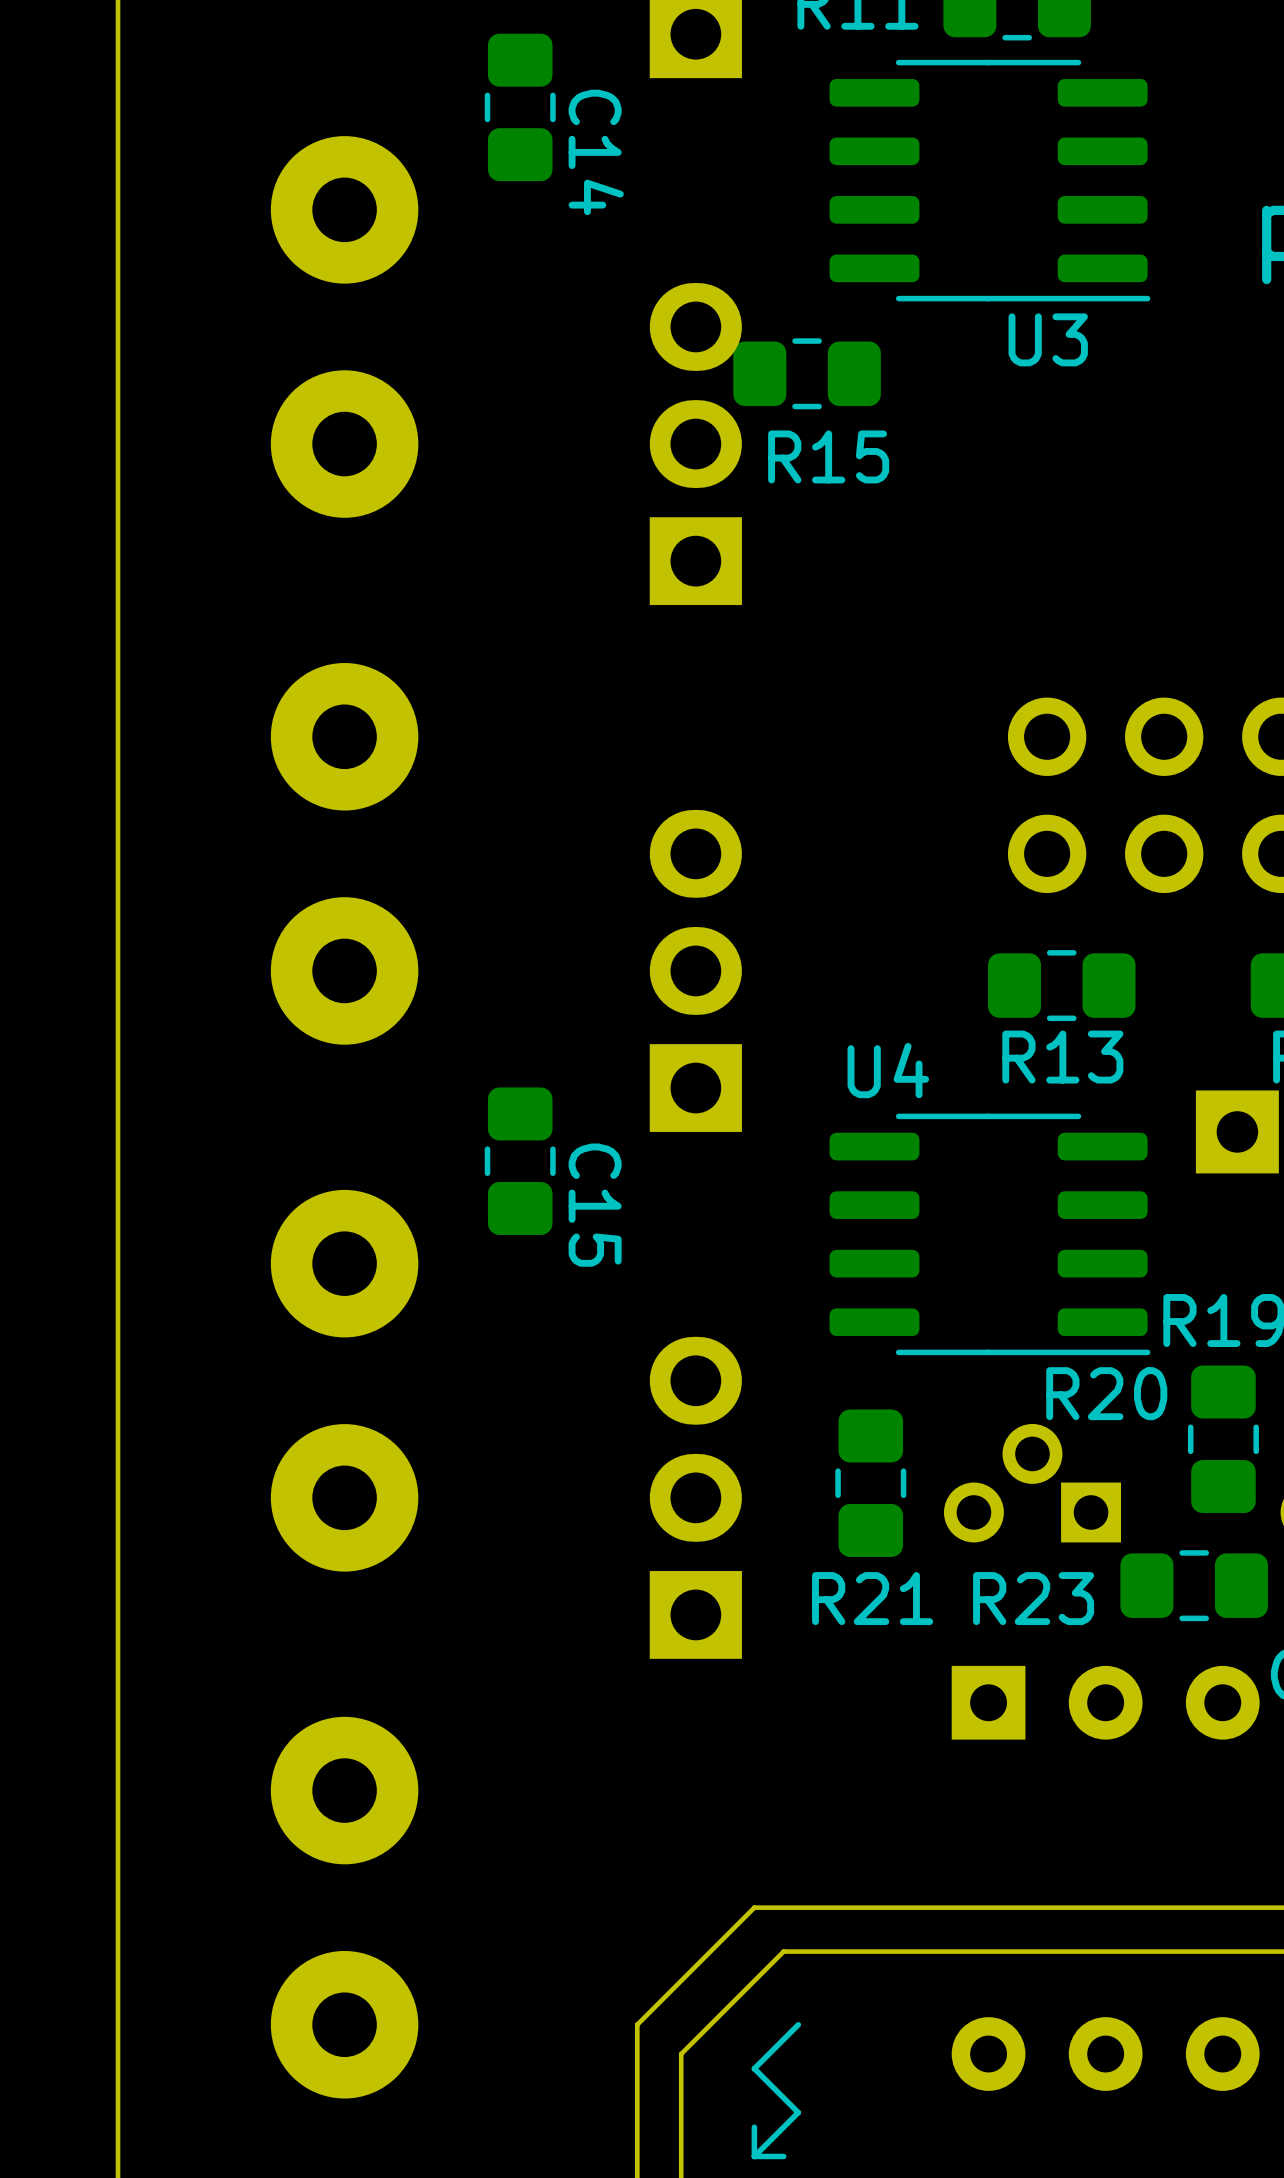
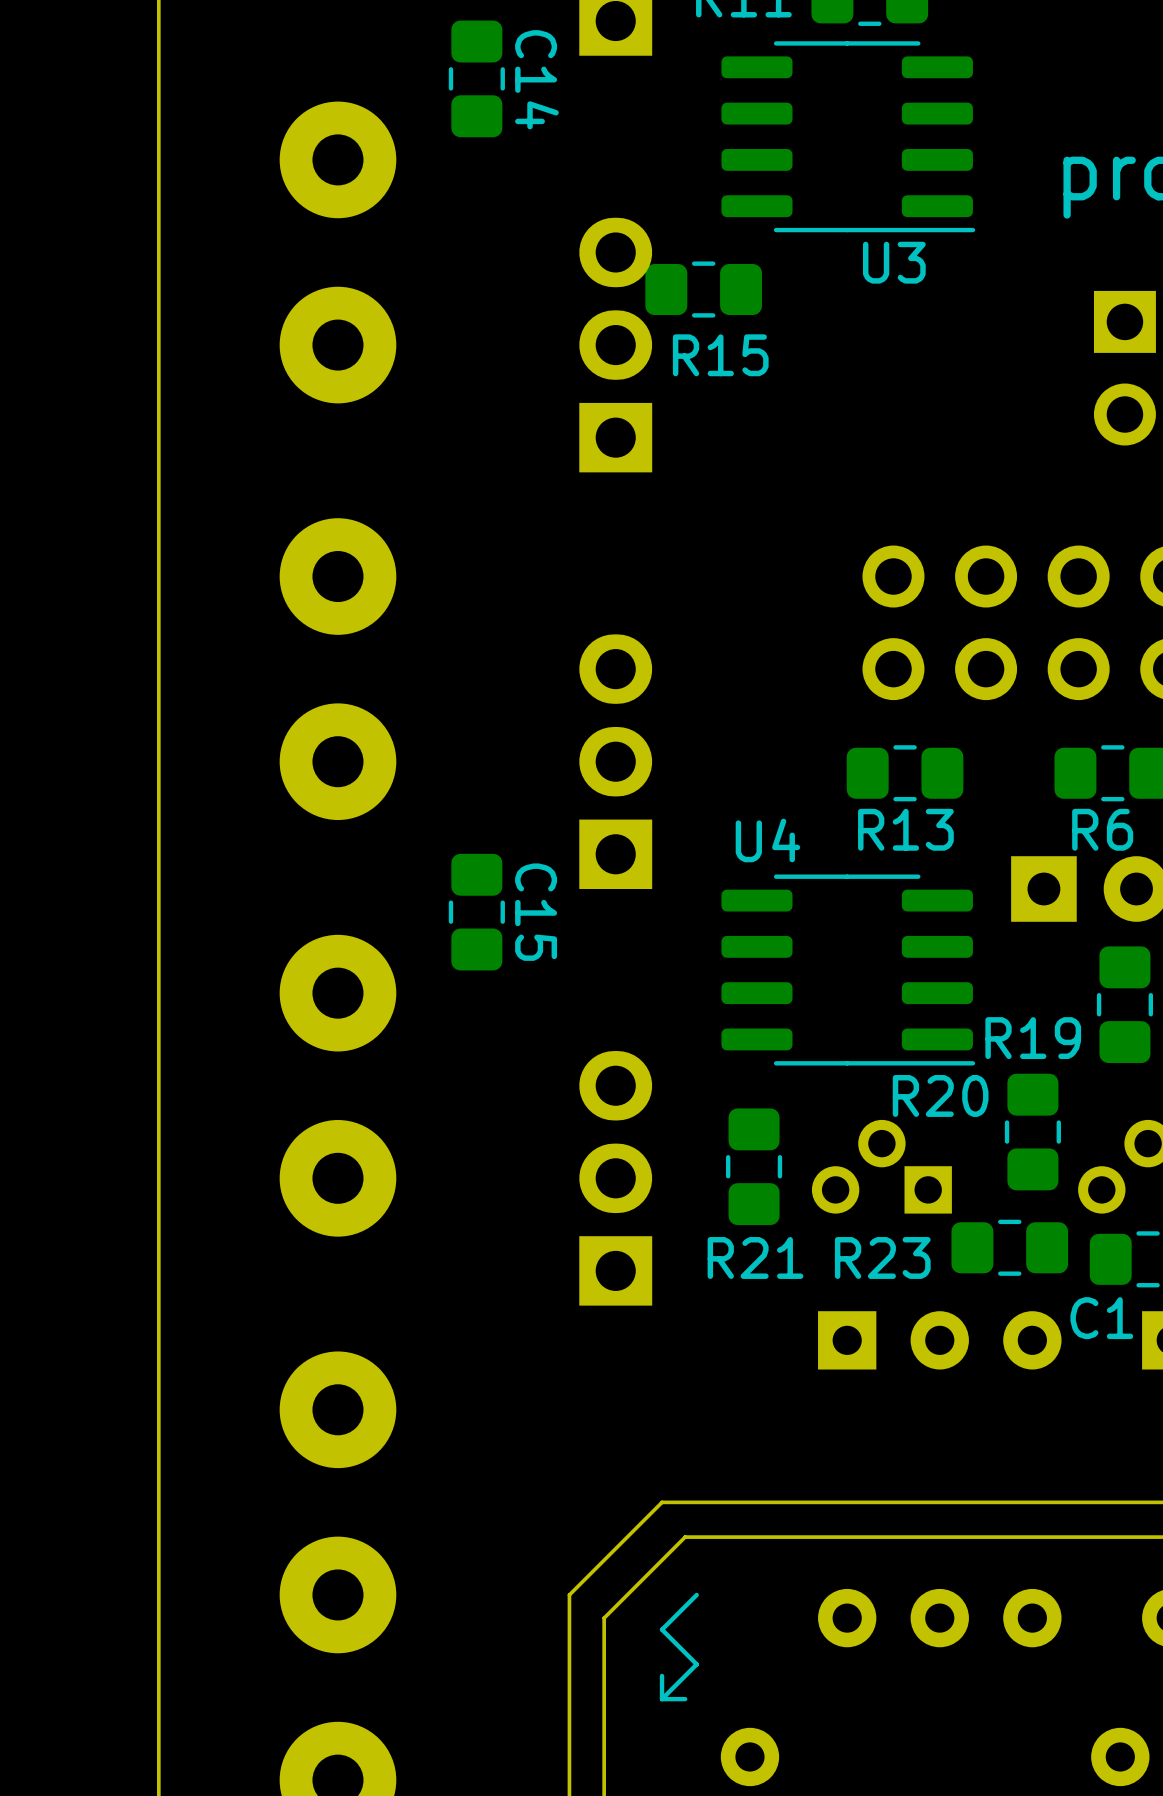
C14 name position: C14 (596, 152) -> C14 (536, 79)
C15 name position: C15 (595, 1205) -> C15 (536, 912)

